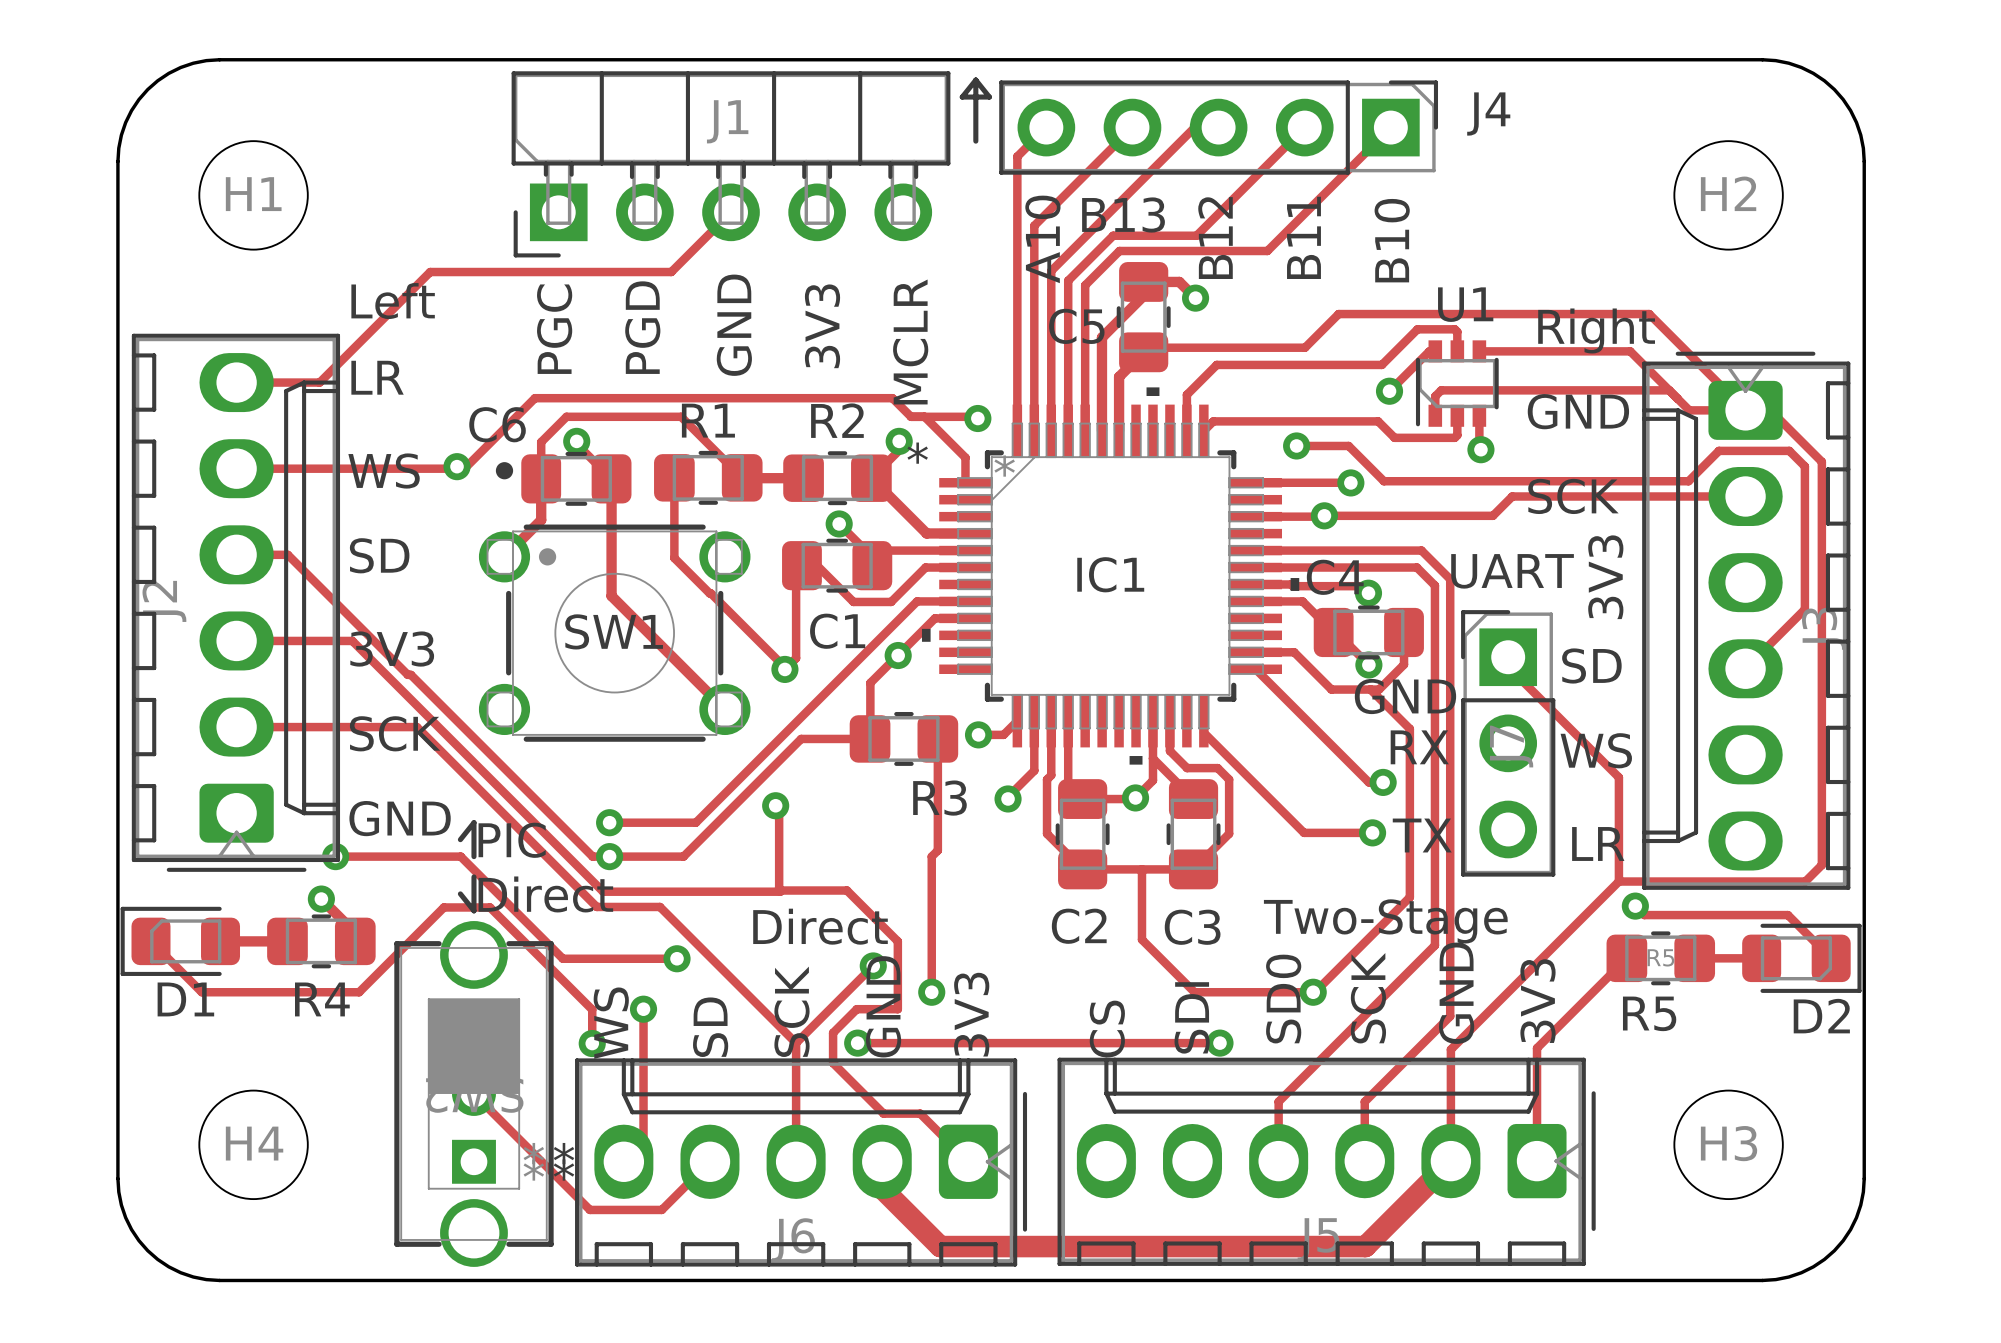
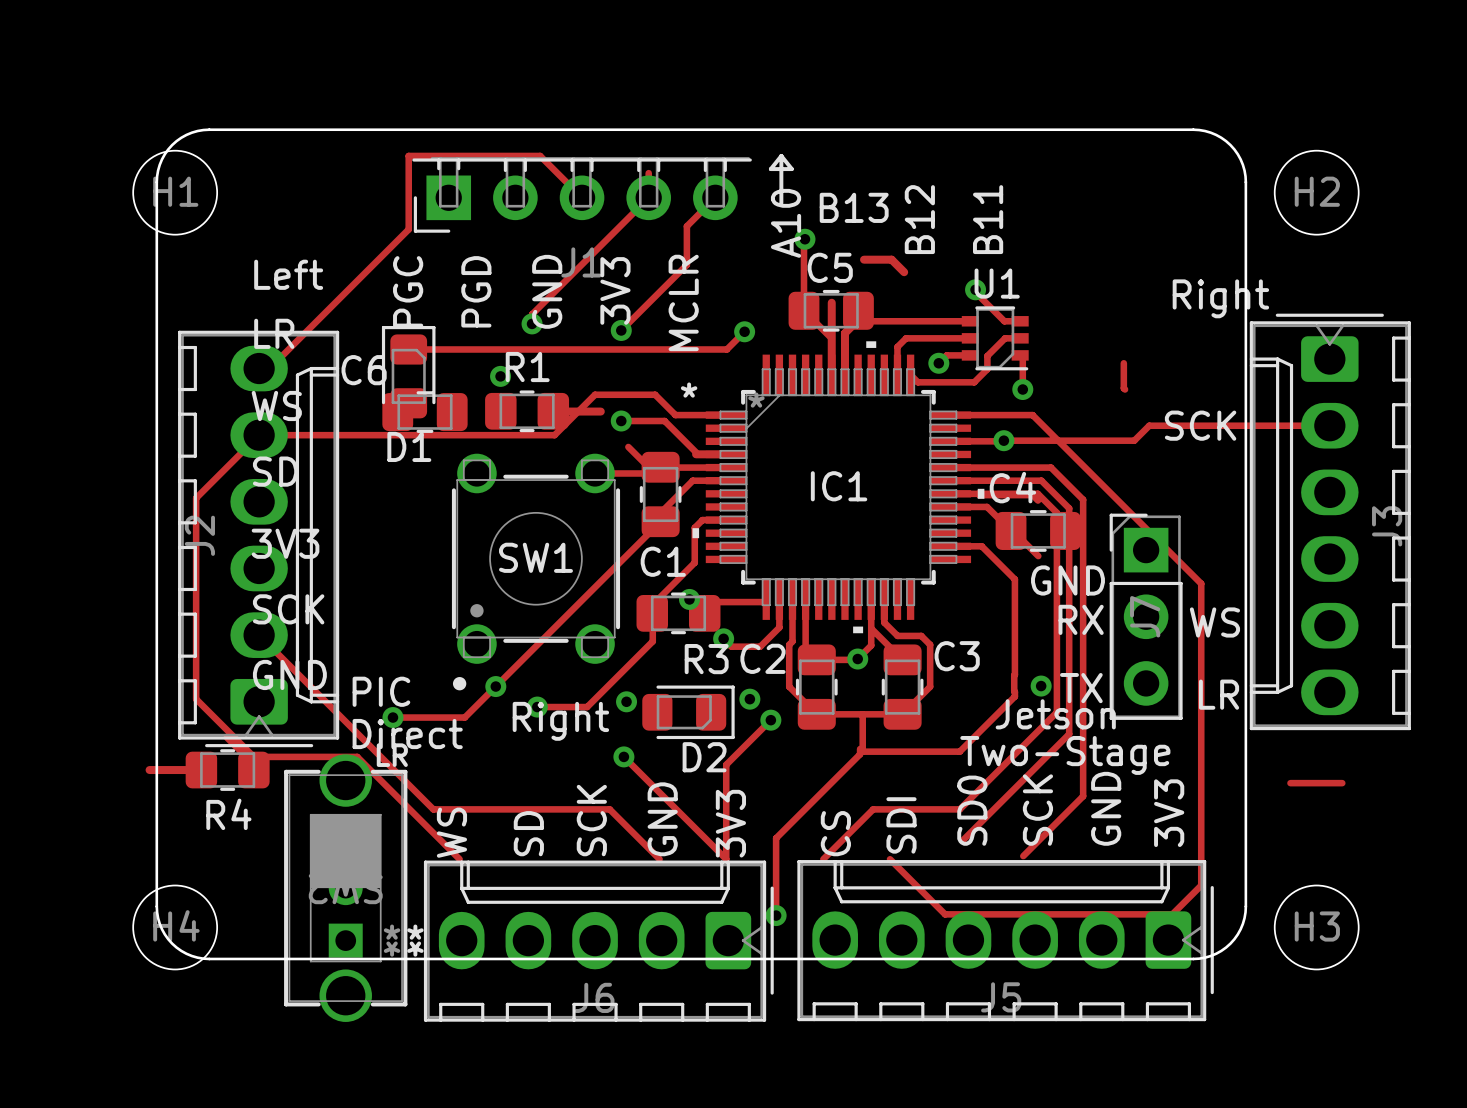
board edge: (219, 59) (1762, 59) (1788, 63) (1813, 73) (1824, 80) (1843, 99) (1850, 110) (1860, 135) (1864, 161) (1864, 1178) (1860, 1205) (1850, 1229) (1843, 1240) (1824, 1259) (1801, 1272) (1775, 1279) (1762, 1280) (219, 1280) (206, 1279) (180, 1272) (157, 1259) (138, 1240) (131, 1229) (121, 1205) (117, 1178) (117, 161) (118, 148) (125, 122) (138, 99) (147, 89) (157, 80) (180, 67) (206, 60) (219, 59) -> (209, 129) (186, 134) (172, 145) (159, 164) (156, 182) (156, 906) (161, 929) (176, 947) (191, 956) (209, 958) (1193, 958) (1216, 953) (1234, 939) (1242, 923) (1245, 906) (1245, 182) (1240, 159) (1226, 141) (1210, 132) (1193, 129) (209, 129)
J1 footprint: [511, 71, 951, 258] -> [412, 157, 752, 233]
line: (975, 80) (975, 141) -> (781, 155) (781, 203)
line: (975, 80) (989, 97) (962, 97) (975, 80) -> (781, 155) (791, 169) (770, 169) (781, 155)
J1 name position: J1 (727, 121) -> J1 (581, 262)
track: (1046, 127) (1017, 156) (1017, 430) -> none
track: (1132, 127) (1034, 225) (1034, 430) -> none
track: (1194, 127) (1051, 270) (1051, 430) -> none
J4: (1218, 127) -> none
track: (1304, 127) (1196, 235) (1113, 235) (1068, 280) (1068, 430) -> none
track: (1390, 127) (1267, 250) (1119, 250) (1085, 285) (1085, 430) -> none
track: none -> (648, 173) (648, 197) (532, 314) (532, 323)
track: none -> (582, 197) (540, 155) (408, 155) (408, 229) (269, 368) (259, 368)
track: none -> (715, 197) (686, 226) (686, 264) (621, 330)
track: (731, 212) (671, 272) (430, 272) (319, 382) (236, 382) -> none
text: B10 (1392, 240) -> none
track: none -> (804, 239) (803, 310) (831, 338)
via: none -> (804, 239)
track: (1143, 295) (1101, 337) -> none
via: (1195, 298) -> none
C5 rotation: 0° (1143, 317) -> 90° clockwise (831, 310)
track: none -> (975, 289) (975, 292) (1004, 321) (1020, 321)
via: none -> (975, 289)
track: (1148, 347) (1305, 347) (1338, 314) (1649, 314) (1745, 410) (1689, 410) (1630, 351) (1479, 351) -> none
track: (1435, 351) (1429, 351) (1389, 391) -> none
track: (1457, 351) (1457, 331) (1454, 329) (1417, 329) (1381, 364) (1216, 364) (1186, 394) -> (970, 338) (906, 338) (897, 346)
track: none -> (868, 321) (970, 321)
via: none -> (532, 323)
via: none -> (621, 330)
track: none -> (744, 331) (726, 349) (408, 349)
U1 rotation: 0° (1457, 383) -> 90° counterclockwise (995, 338)
U1 position: (1457, 383) -> (995, 338)
track: (1669, 390) (1441, 390) (1435, 396) (1435, 415) -> none
via: (1389, 391) -> none
track: none -> (970, 355) (946, 355) (938, 363)
track: none -> (1020, 355) (1022, 358) (1022, 389)
track: (1770, 410) (1821, 461) (1821, 865) (1805, 881) (1618, 881) -> none
text: GND (1578, 411) -> none
via: none -> (938, 363)
track: (1457, 415) (1457, 435) (1454, 437) (1394, 437) (1378, 421) (1213, 421) (1203, 430) -> (1020, 338) (1005, 338) (987, 356) (987, 369) (974, 382) (917, 382) (910, 374)
track: (924, 416) (965, 457) (965, 482) -> (459, 859) (357, 756) (253, 756) (196, 699) (196, 498) (259, 435) (554, 435) (595, 394) (655, 394) (675, 415) (726, 415)
track: (977, 418) (976, 416) (911, 416) (892, 398) (534, 398) (464, 468) (457, 466) (454, 468) (236, 468) -> none
via position: (977, 418) -> (744, 331)
via: none -> (500, 376)
track: (576, 441) (576, 444) (611, 478) (611, 596) (724, 709) -> none
via: (576, 441) -> none
track: (899, 441) (899, 450) (871, 478) (926, 533) -> none
via: (899, 441) -> none
track: (1296, 445) (1348, 445) (1383, 481) (1688, 481) (1718, 450) (1789, 450) (1804, 466) (1804, 609) (1745, 668) -> none
via: (1296, 445) -> none
via: none -> (1022, 389)
via: (1480, 449) -> none
SW1 footprint: [478, 462, 751, 742] -> [451, 453, 621, 691]
via: (457, 466) -> none
track: (674, 477) (674, 558) (784, 669) (796, 658) (796, 571) -> none
track: (742, 477) (681, 416) (566, 416) (541, 442) (541, 520) (504, 556) -> none
R2: (837, 478) -> none
track: none -> (1024, 415) (1032, 415) (1201, 583) (1201, 885) (1172, 914) (945, 914) (890, 859)
via: (1350, 482) -> none
track: none -> (621, 421) (664, 421) (698, 454)
via position: (839, 523) -> (621, 421)
track: (1385, 550) (1421, 550) (1450, 579) (1450, 1016) (1364, 1101) (1364, 1161) -> (1050, 467) (1083, 499) (1083, 796) (1023, 856)
track: (236, 554) (287, 554) (592, 856) (683, 856) (801, 738) (870, 738) -> none
track: none -> (595, 473) (650, 473)
track: (817, 565) (853, 601) (891, 601) (925, 567) -> (660, 512) (692, 480) (695, 480)
C1 rotation: 0° (837, 565) -> 90° clockwise (660, 494)
track: (1372, 567) (1416, 567) (1434, 585) (1434, 945) (1278, 1101) (1278, 1161) -> (1041, 480) (1069, 508) (1069, 734) (963, 839)
text: UART (1512, 571) -> none
text: 3V3 (1605, 577) -> none
via: (1368, 593) -> none
track: (965, 601) (917, 601) (695, 822) (609, 822) -> none
J2 position: (235, 602) -> (258, 538)
track: none -> (660, 521) (464, 717) (392, 717)
track: (924, 628) (898, 655) -> (694, 527) (694, 562) (652, 604) (652, 641) (587, 707) (537, 707)
track: (1404, 632) (1404, 664) (1379, 689) (1331, 689) (1294, 652) -> (862, 751) (959, 751) (1014, 696) (1014, 579) (980, 546)
track: (236, 640) (352, 640) (603, 891) (780, 891) (779, 890) -> none
track: (897, 655) (870, 682) (870, 738) -> none
via: (898, 655) -> none
via: (1368, 664) -> none
text: SD (1591, 665) -> none
track: (1508, 666) (1618, 777) (1618, 881) -> none
via: (784, 669) -> none
track: (1255, 669) (1368, 782) (1383, 782) -> none
track: (1370, 689) (1409, 728) (1409, 897) (1314, 992) (1267, 992) -> (978, 493) (1037, 493) (1056, 512) (1056, 712) (959, 809)
via: none -> (689, 599)
track: (1014, 724) (1003, 734) (978, 734) -> (763, 602) (692, 602) (689, 599)
track: (236, 727) (416, 727) (596, 906) (659, 906) (796, 1043) -> none
track: (1203, 732) (1304, 832) (1372, 832) -> none
via: (978, 734) -> none
track: (937, 738) (937, 850) (931, 856) (931, 992) -> none
track: (1034, 757) (1034, 770) (1008, 798) -> (779, 627) (760, 646) (731, 646) (723, 638)
track: none -> (259, 635) (433, 809) (609, 809) (659, 859)
via: none -> (723, 638)
via: (1383, 782) -> none
via: (1008, 798) -> none
track: (775, 805) (779, 809) (779, 890) -> none
via: (775, 805) -> none
via: (609, 822) -> none
via: none -> (495, 686)
line: (460, 839) (473, 822) (473, 856) -> none
via: none -> (749, 699)
via: none -> (626, 701)
track: (335, 856) (460, 856) (562, 958) (677, 958) -> none
via: (335, 856) -> none
via: (609, 856) -> none
via: none -> (537, 707)
via: none -> (392, 717)
text: none -> Jetson (1055, 714)
line: (473, 876) (473, 910) (460, 893) -> none
text: none -> Right (560, 721)
track: none -> (770, 720) (726, 764) (726, 859) (623, 756)
via: none -> (770, 720)
track: (1618, 881) (1450, 1049) (1450, 1161) (1365, 1246) (940, 1246) (882, 1188) (882, 1161) -> none
track: (779, 890) (846, 890) (897, 941) (897, 1009) (856, 1009) (833, 1032) (833, 1063) (883, 1113) (920, 1113) (968, 1161) -> none
via: (321, 899) -> none
track: (1635, 906) (1644, 915) (1787, 915) (1831, 958) -> none
via: (1635, 906) -> none
track: none -> (860, 749) (860, 754) (776, 838) (776, 915)
track: (1141, 917) (1141, 939) (1194, 992) -> (823, 859) (873, 809) (903, 809)
text: none -> LR (392, 755)
text: Direct (820, 926) -> none
C2 name position: C2 (1079, 926) -> C2 (762, 658)
C3 name position: C3 (1192, 927) -> C3 (957, 656)
track: (150, 941) (201, 992) (359, 992) (443, 907) (490, 907) (592, 1009) (592, 1043) -> none
D1 rotation: 0° (180, 941) -> 90° clockwise (408, 372)
D1 position: (180, 941) -> (408, 372)
via: (677, 958) -> none
track: (1626, 958) (1537, 1048) (1537, 1161) -> none
R5: (1660, 958) -> none
D2 position: (1801, 958) -> (688, 712)
track: (873, 965) (796, 1043) -> none
via position: (873, 965) -> (623, 756)
via: (931, 992) -> none
via: (1313, 992) -> none
track: (643, 1009) (643, 1142) -> none
via: (643, 1009) -> none
text: R5 (1649, 1013) -> none
via: (592, 1043) -> none
track: (796, 1043) (796, 1161) -> none
track: (857, 1043) (1219, 1043) -> none
via: (857, 1043) -> none
via: (1219, 1043) -> none
track: (473, 1093) (589, 1209) (661, 1209) (709, 1161) -> none
via: none -> (776, 915)

